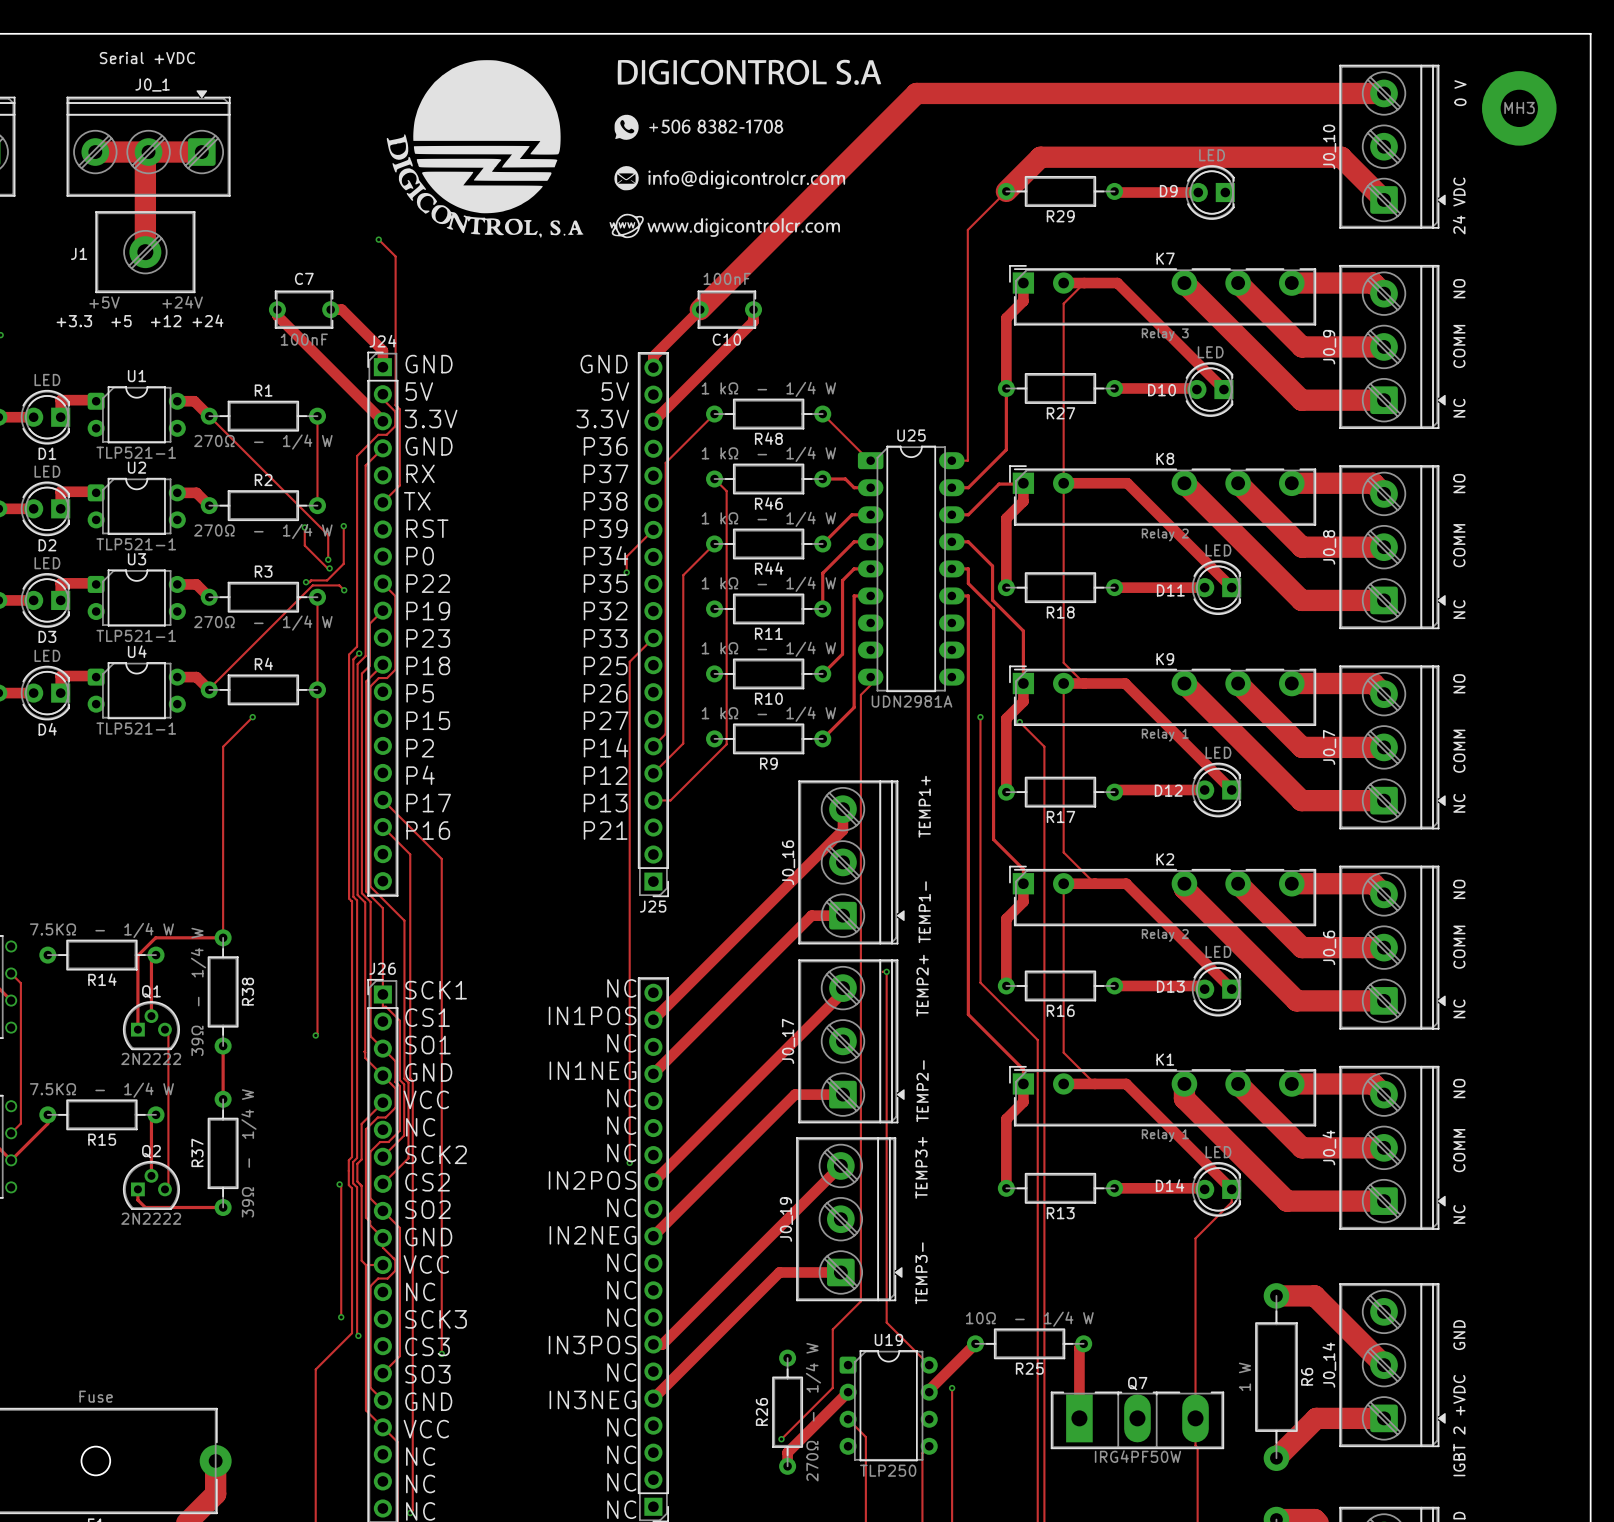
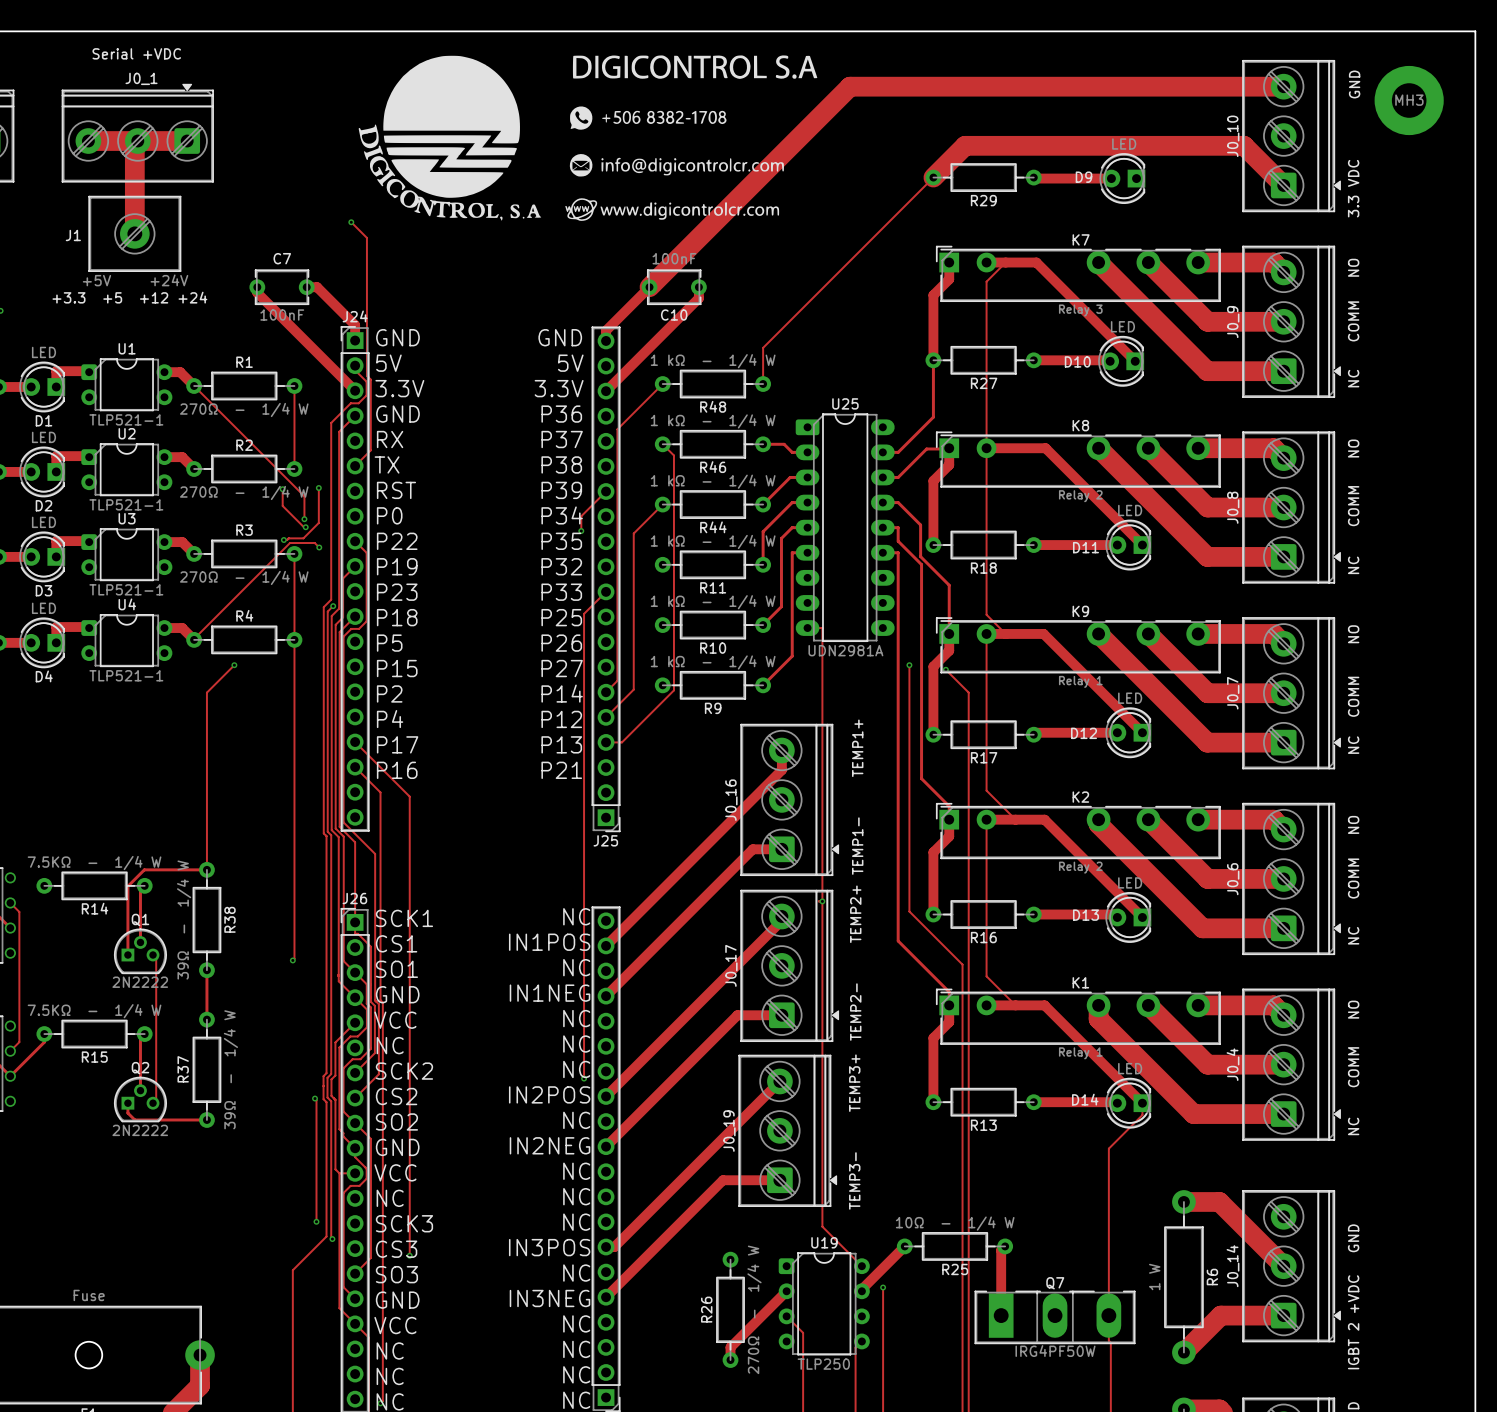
text: 0 V (1460, 93) -> GND (1354, 84)
text: 24 VDC (1459, 205) -> 3.3 VDC (1353, 188)
track: (967, 229) (967, 460) (951, 460) -> (897, 213) (763, 347) (763, 384)
track: (822, 414) (870, 460) -> none
track: (878, 677) (860, 694) (860, 1301) (832, 1329) (832, 1387) (781, 1440) -> (814, 628) (822, 628) (822, 901)
via: (781, 1439) -> none

